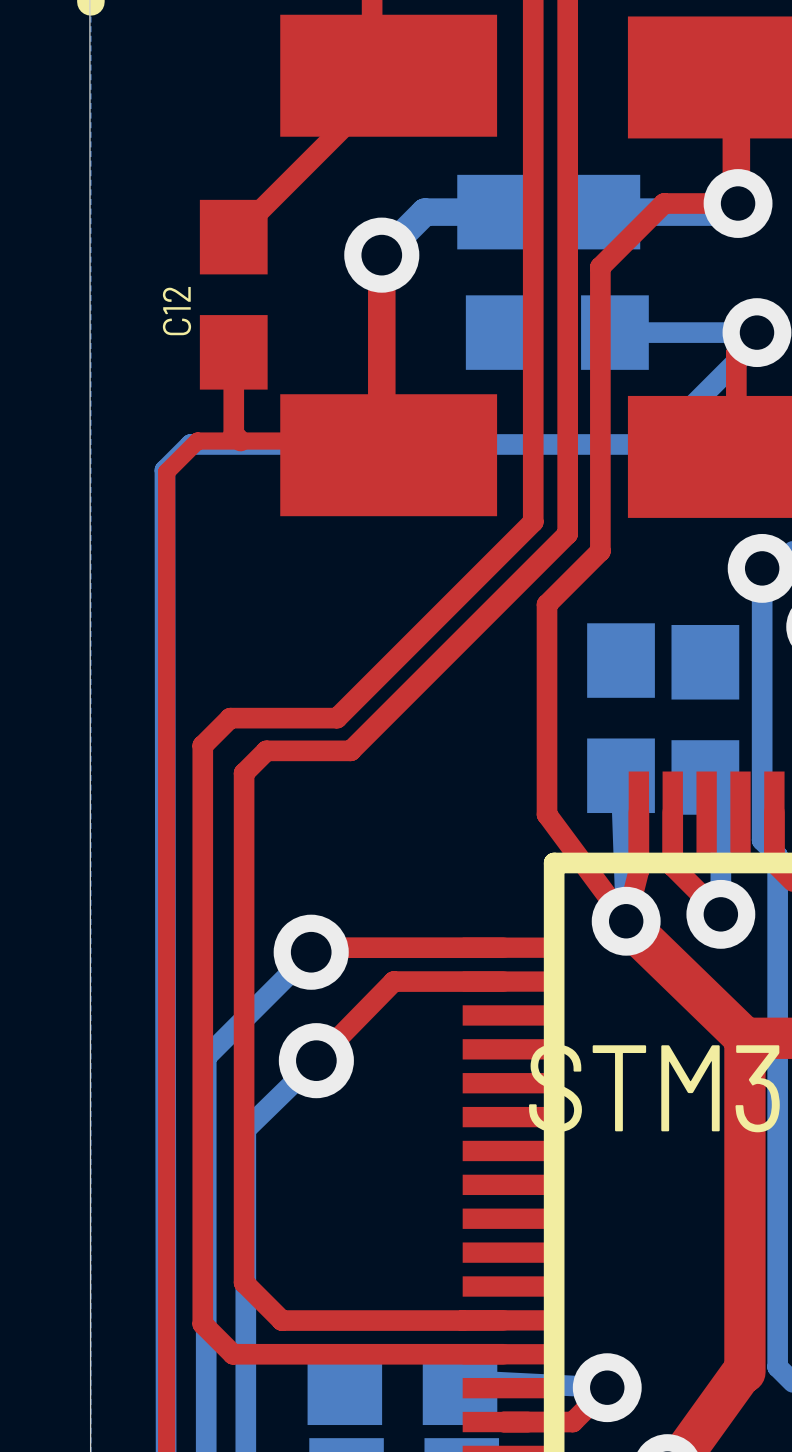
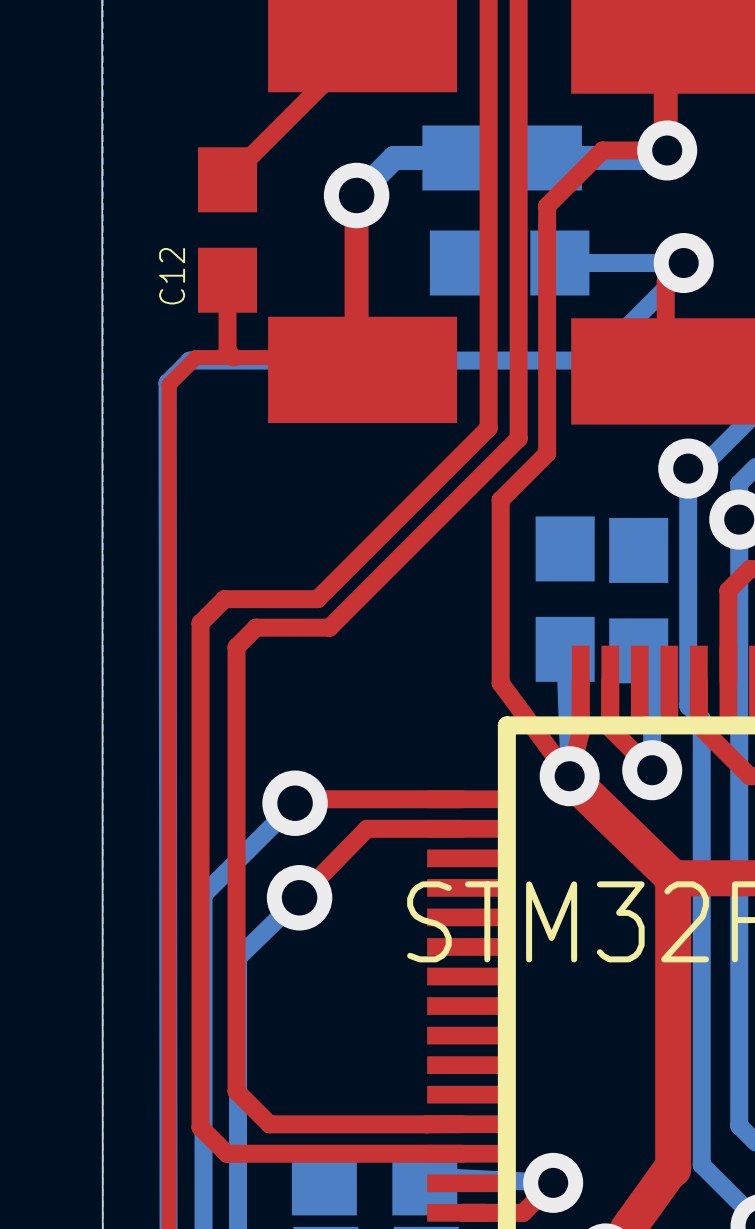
C12 name position: C12 (176, 311) -> C12 (172, 276)

